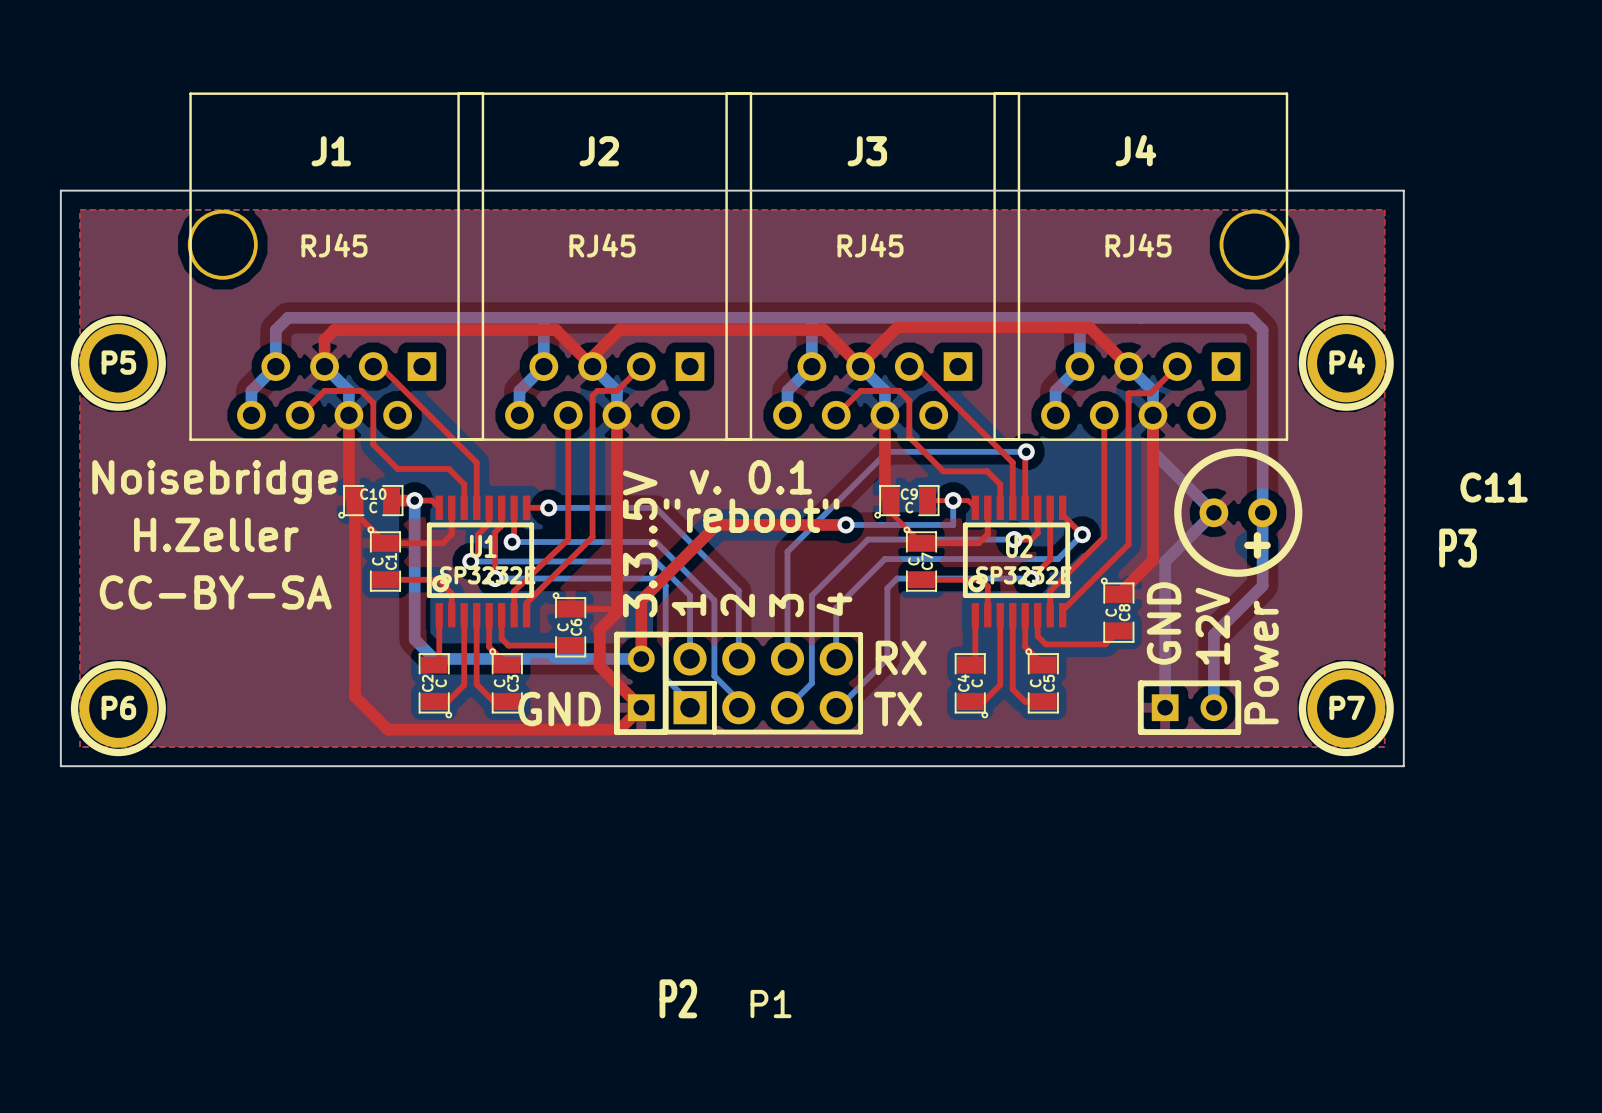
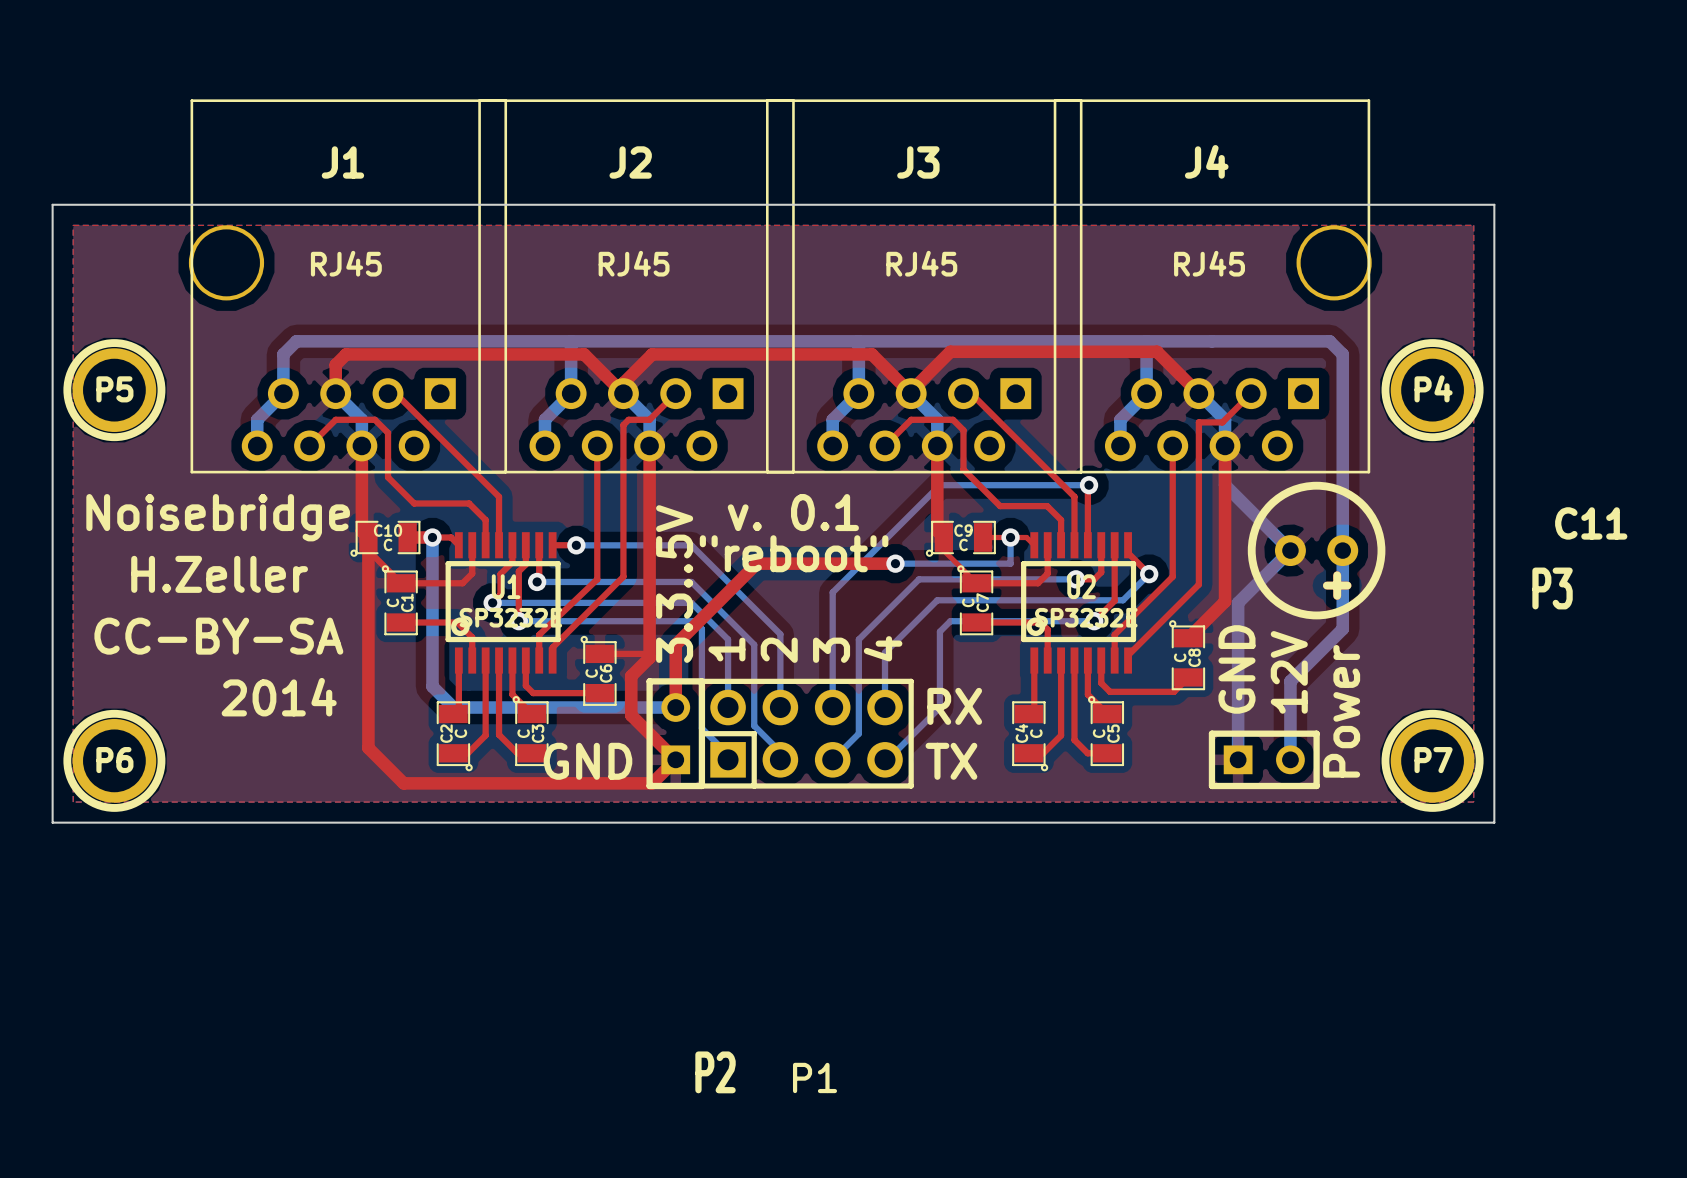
text: none -> 2014 (279, 697)

